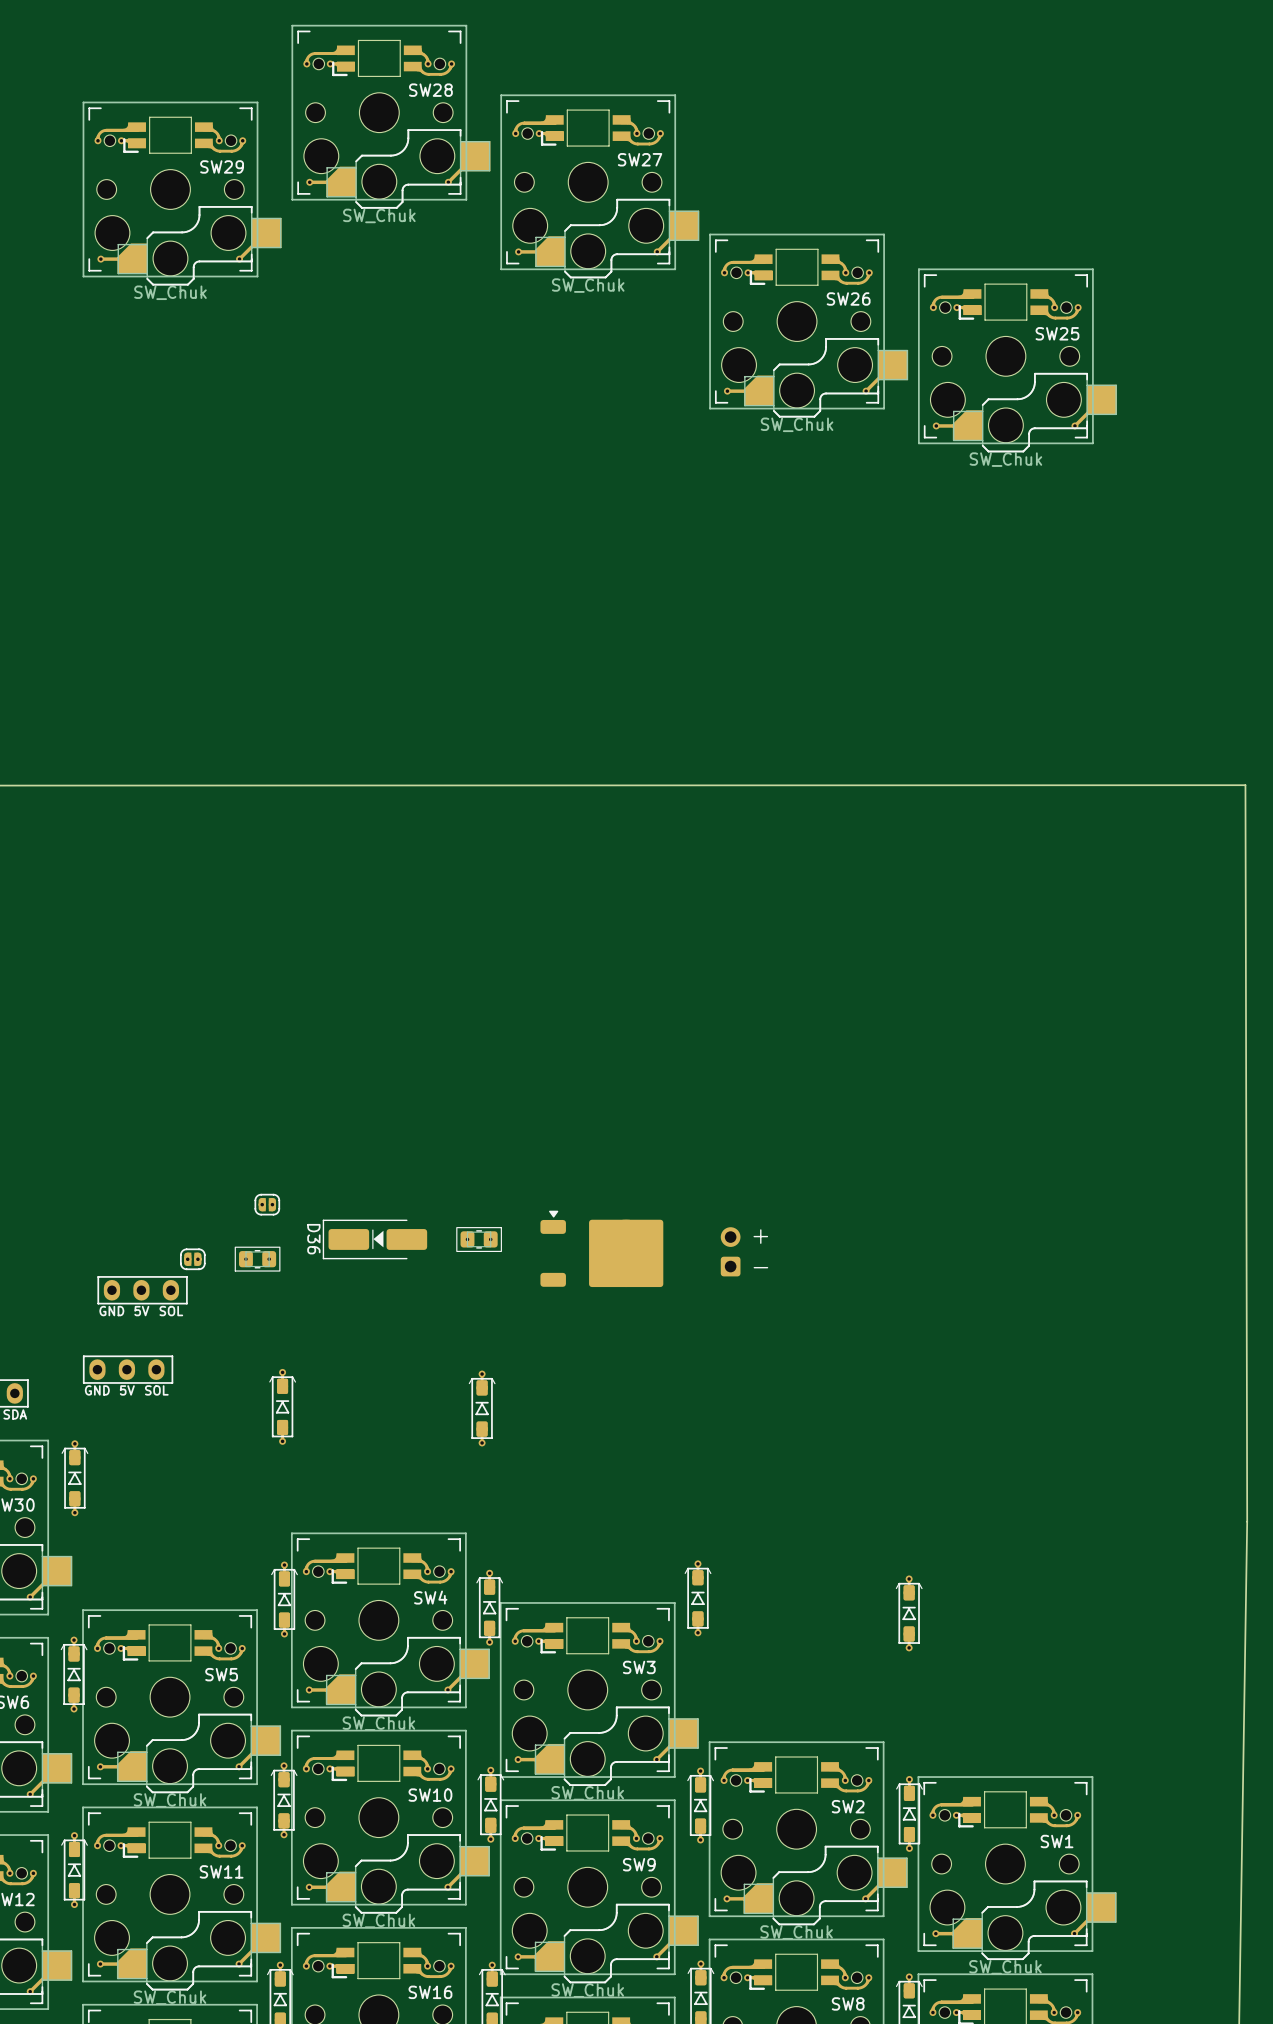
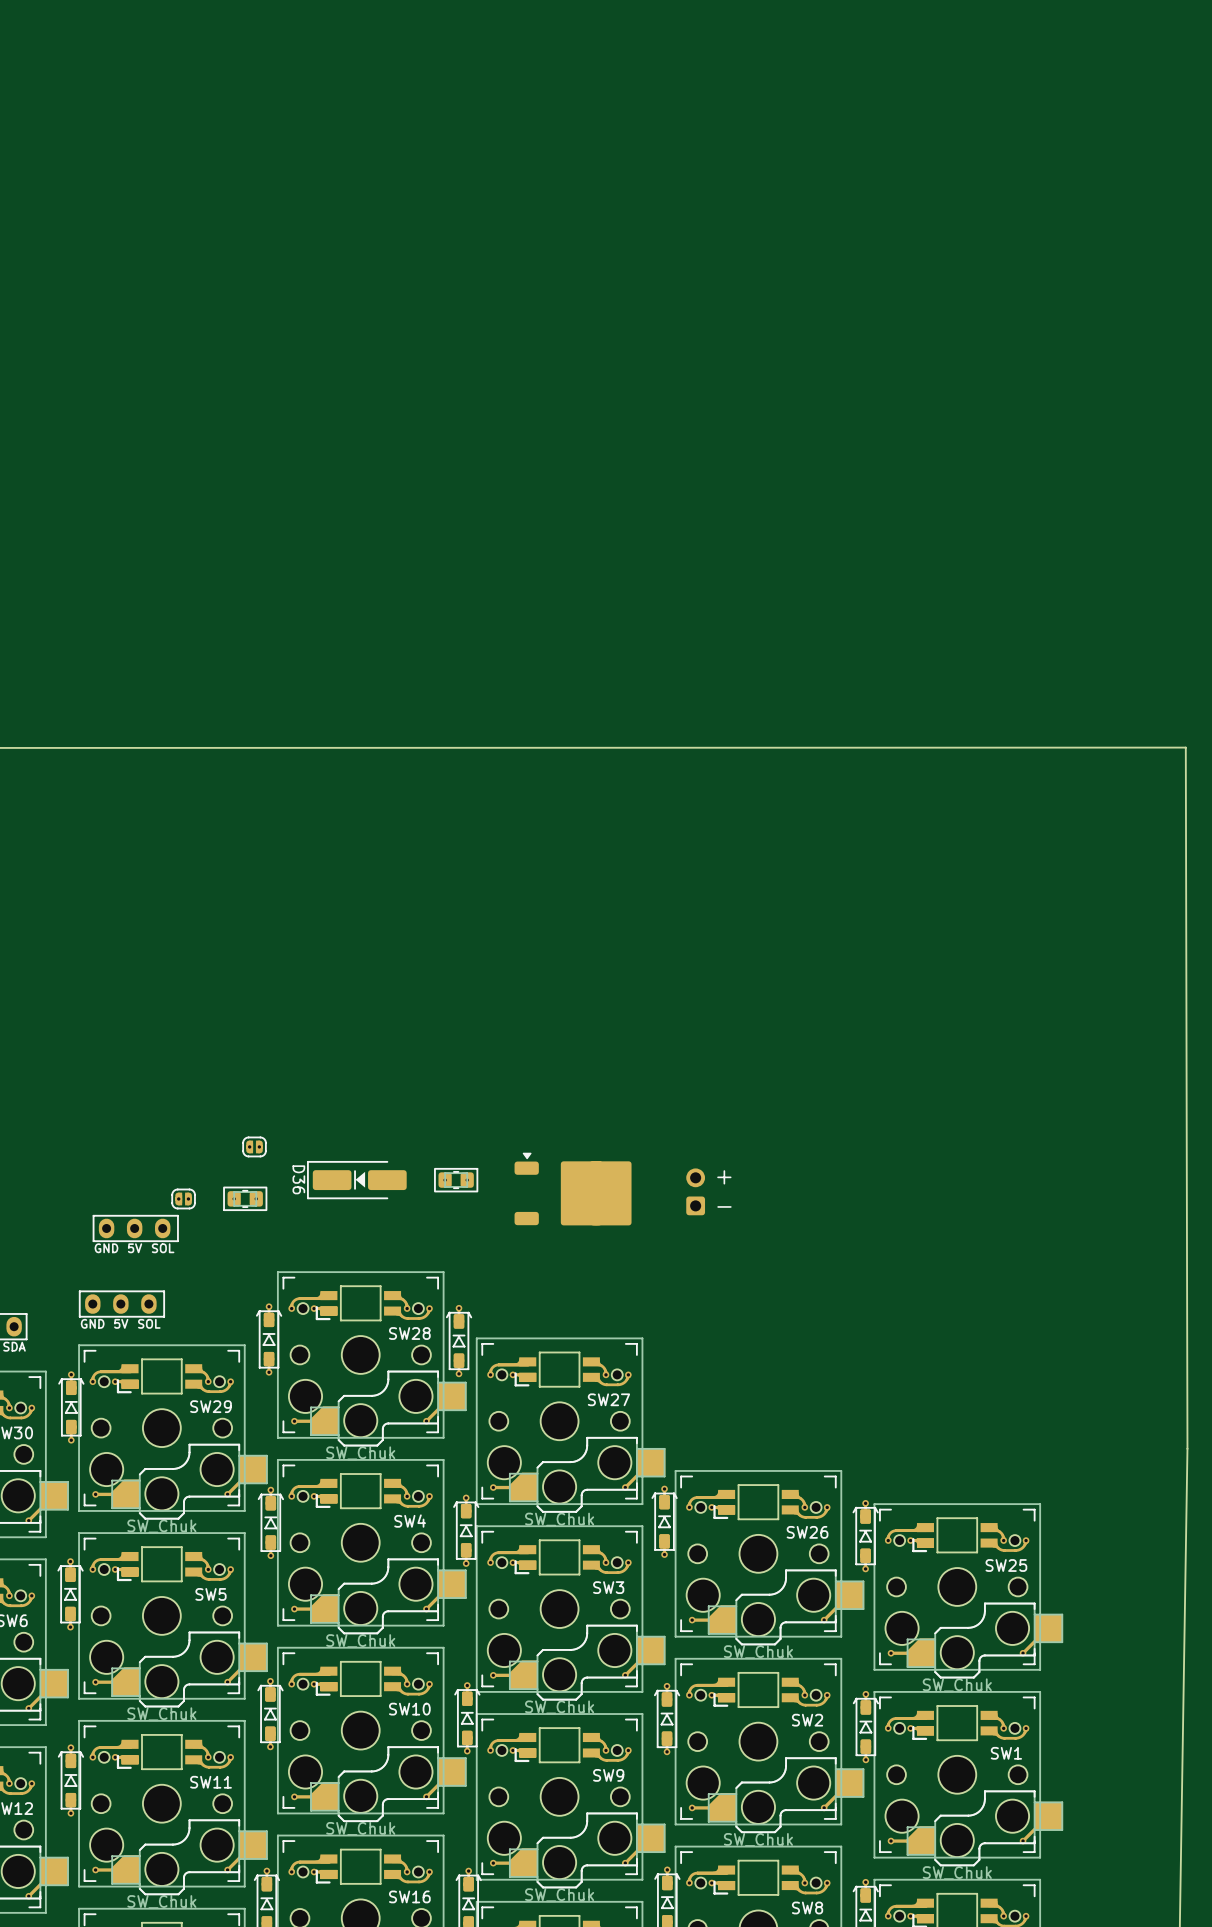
SW28 position: (390, 116) -> (371, 1358)
SW27 position: (599, 186) -> (570, 1425)
SW29 position: (182, 193) -> (172, 1431)
SW26 position: (808, 325) -> (769, 1557)
SW25 position: (1017, 360) -> (968, 1590)

